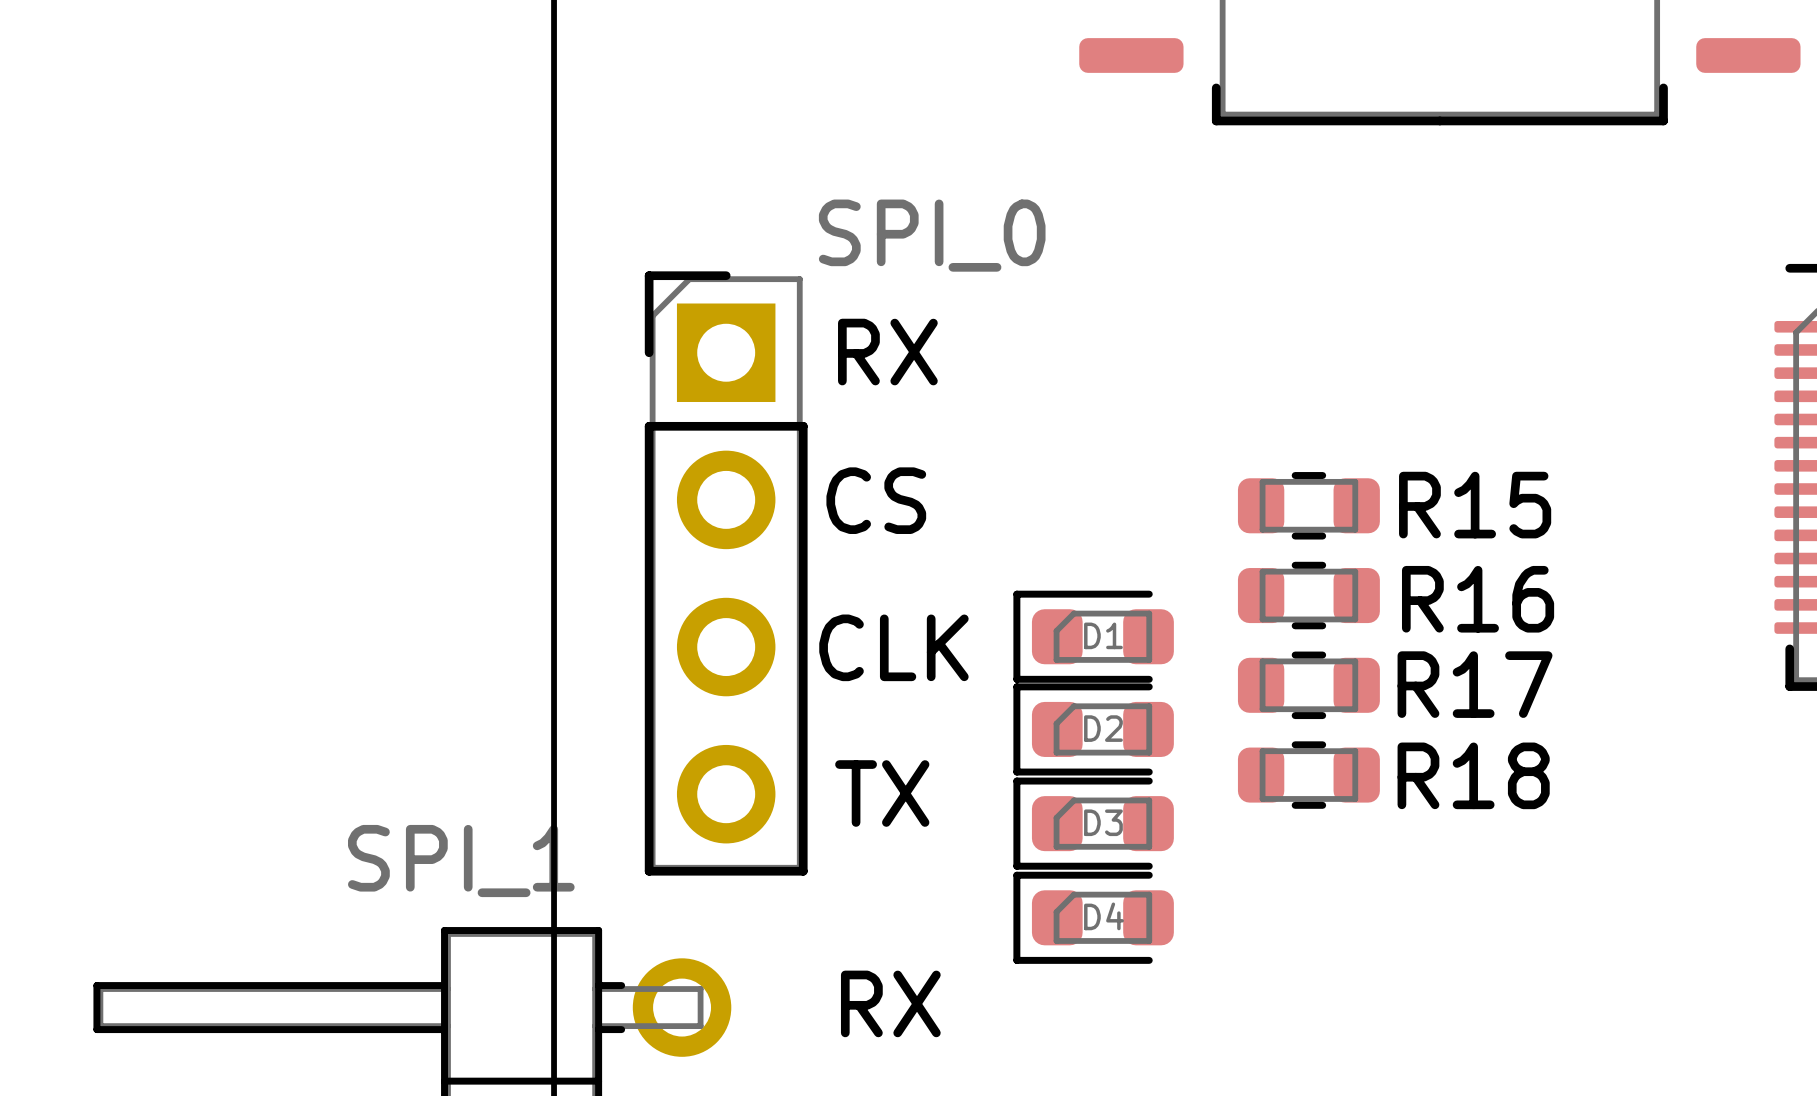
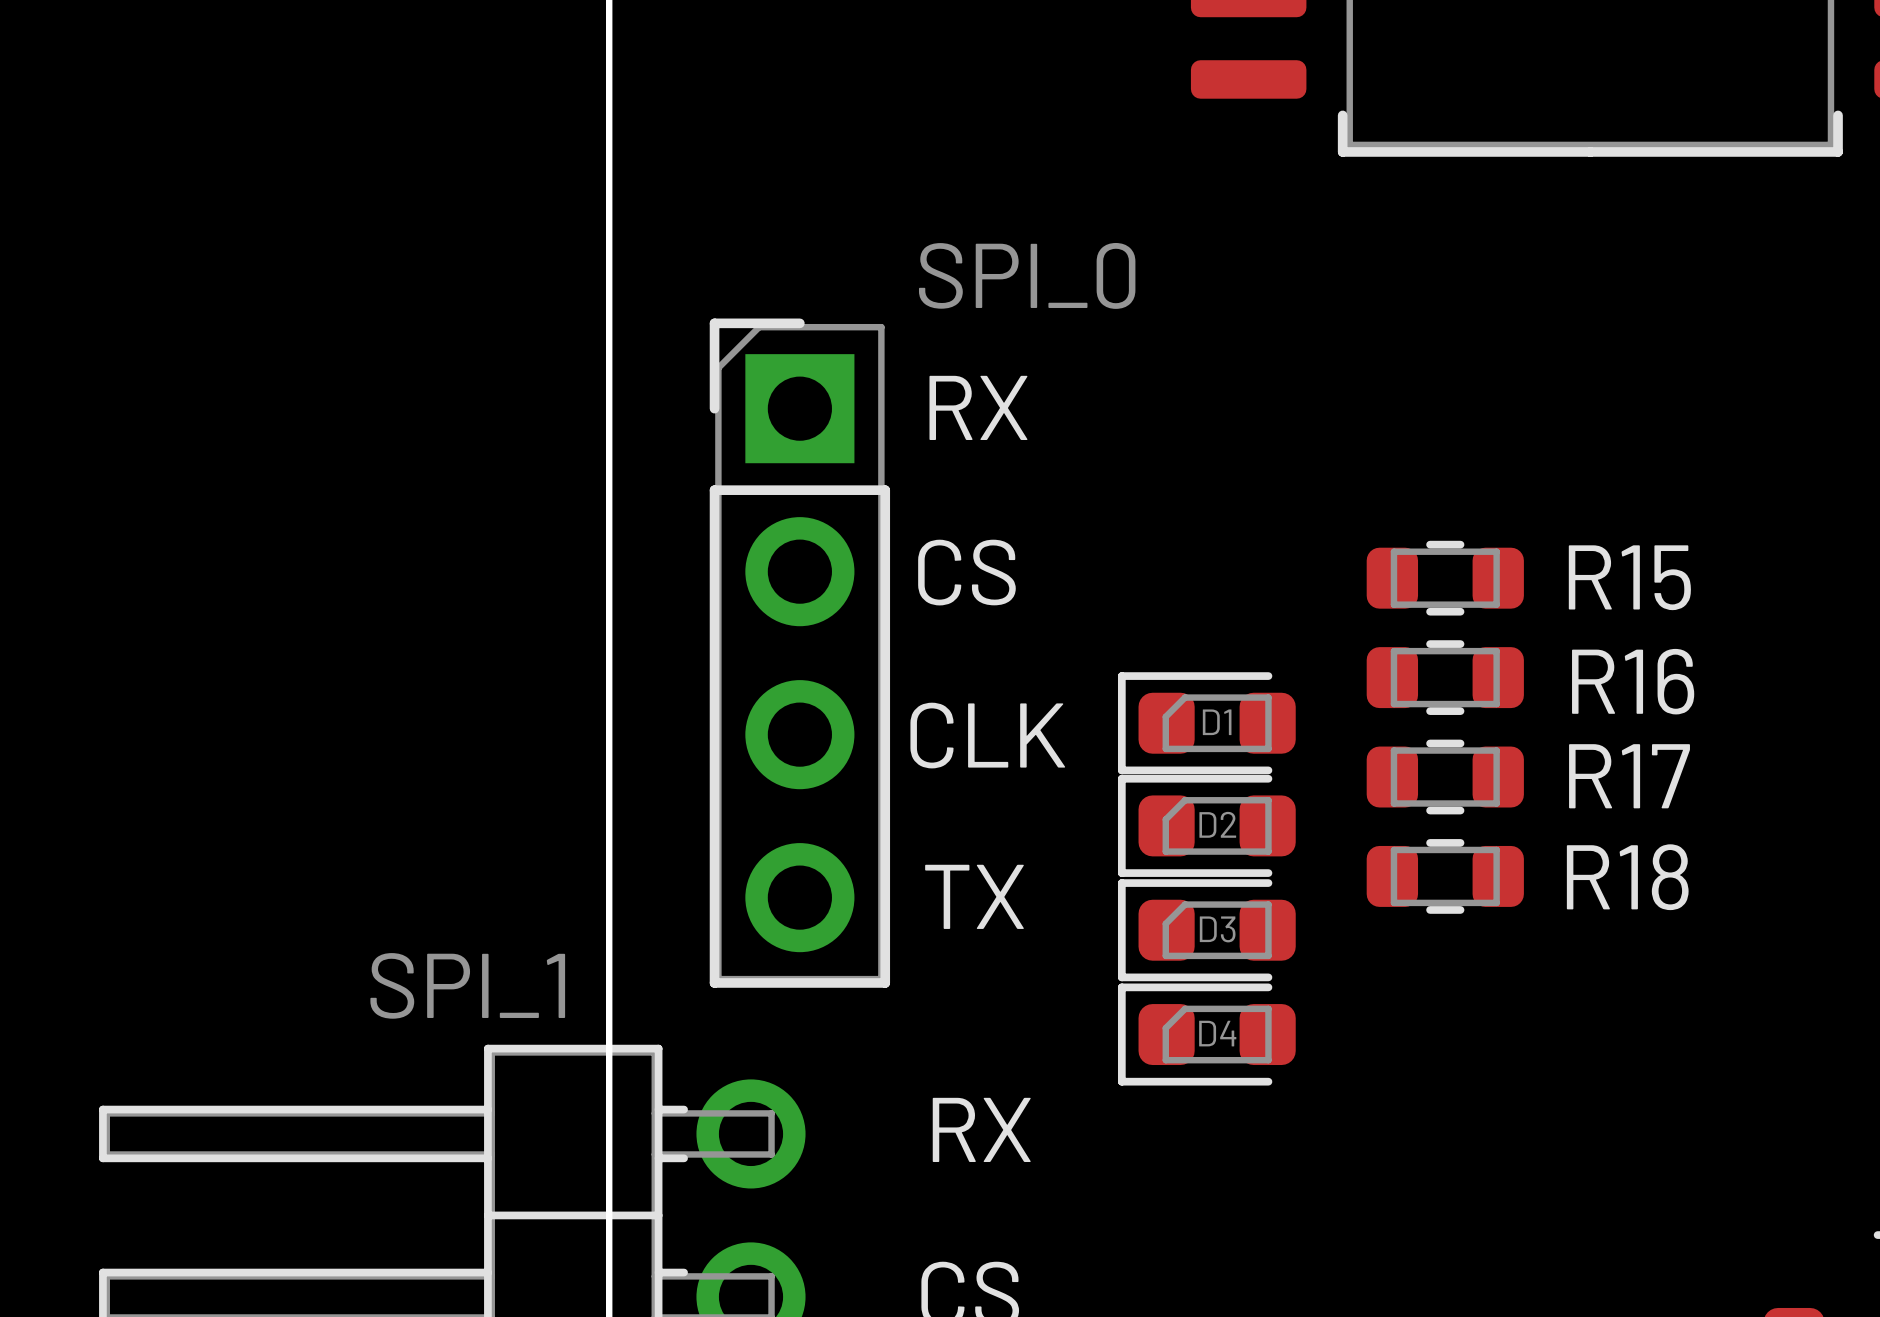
part value position: SPI_1 (461, 861) -> SPI_1 (467, 985)

